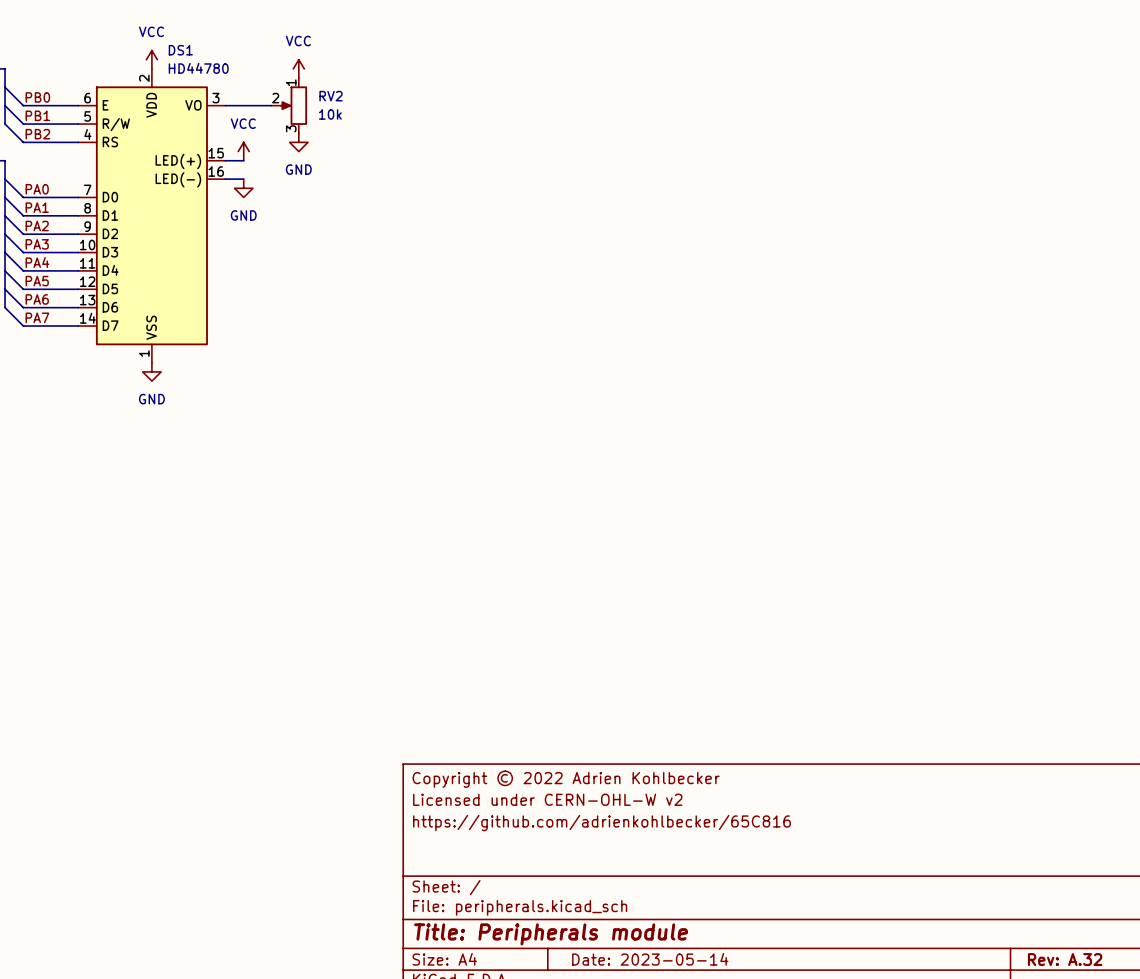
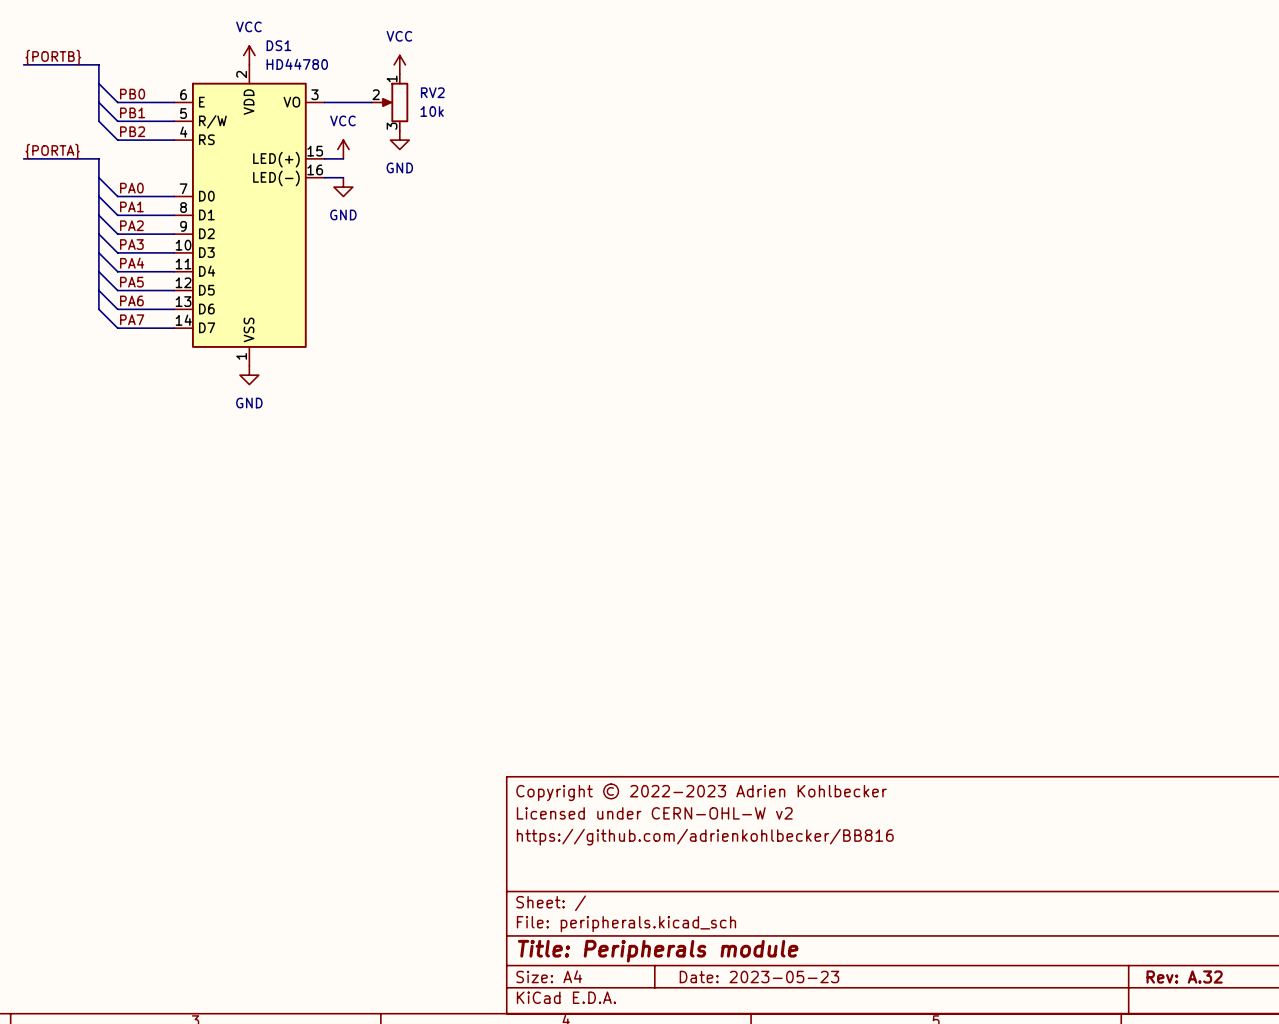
title block: Copyright © 2022 Adrien Kohlbecker (566, 779) -> Copyright © 2022-2023 Adrien Kohlbecker (701, 792)
title block: https://github.com/adrienkohlbecker/65C816 (601, 823) -> https://github.com/adrienkohlbecker/BB816 (705, 837)
title block: Date: 2023-05-14 (650, 959) -> Date: 2023-05-23 (759, 977)

